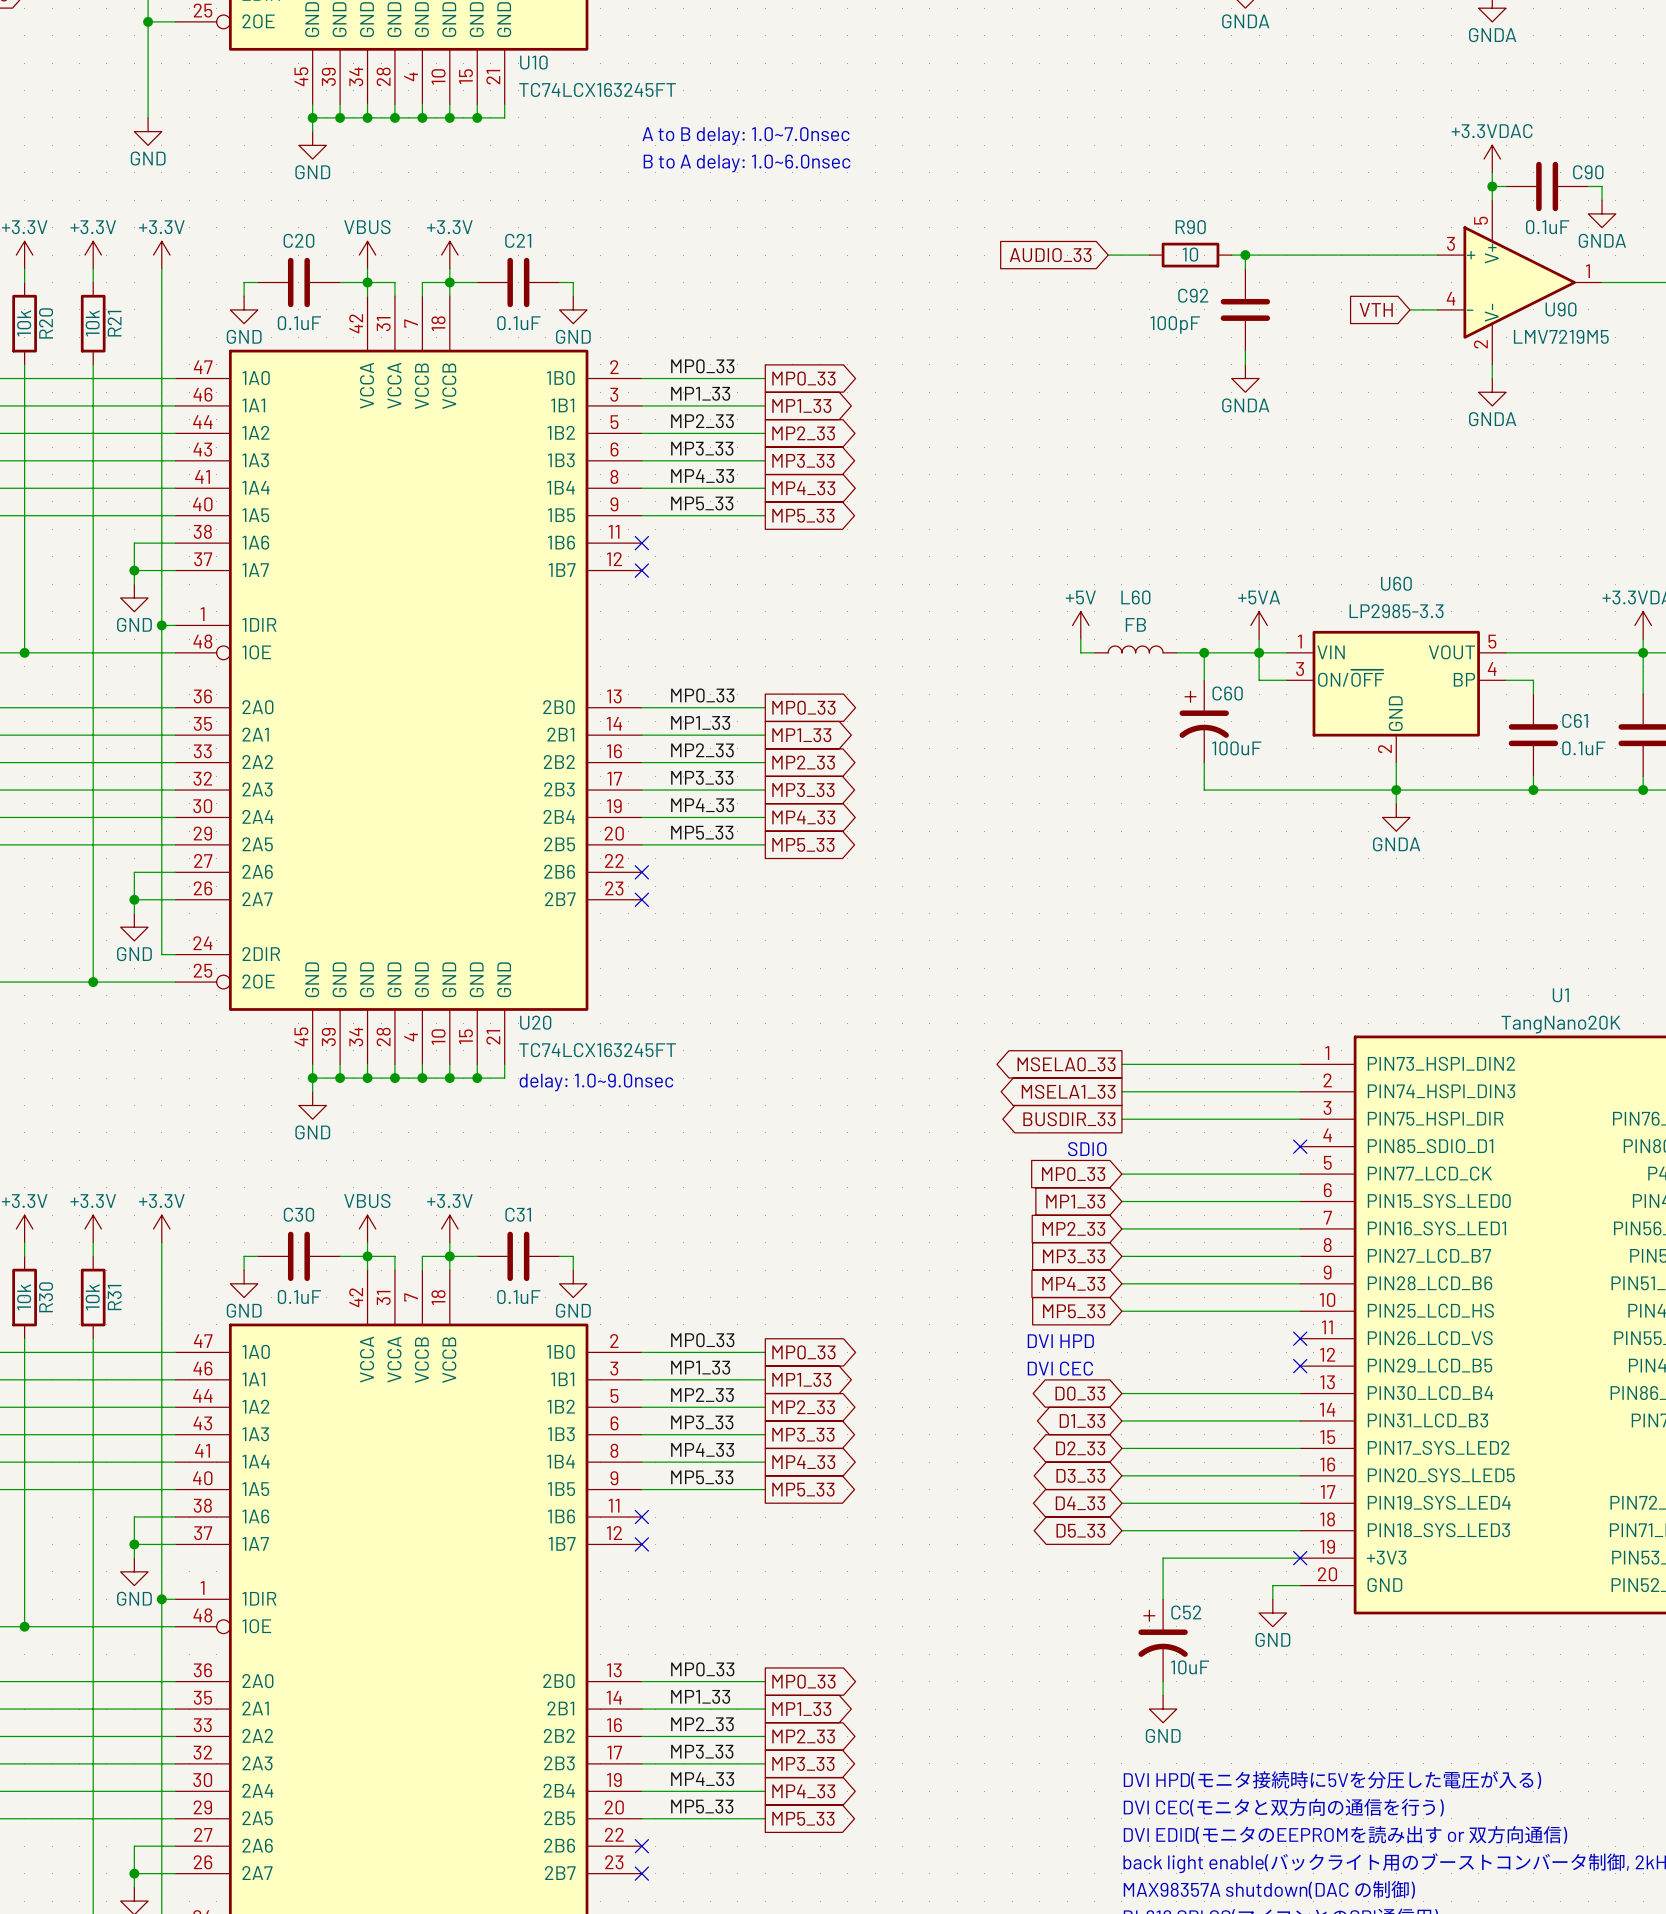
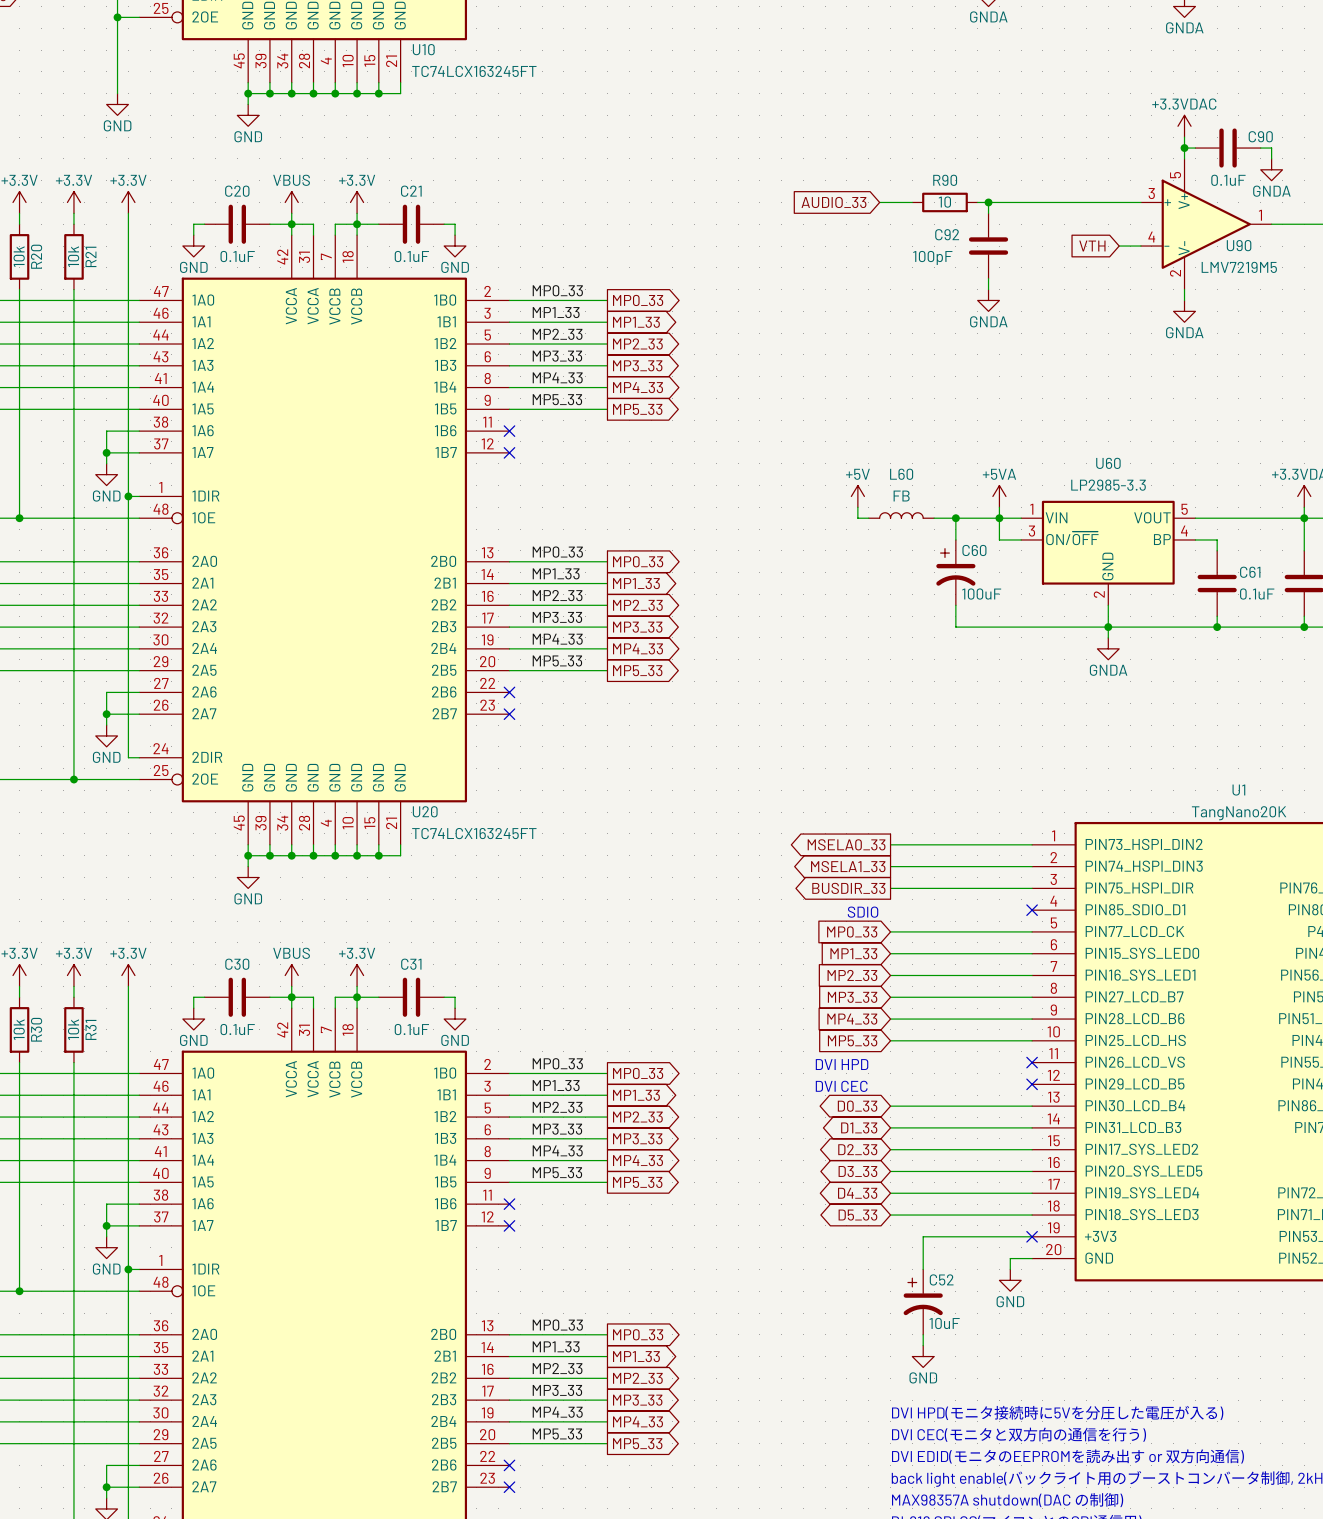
text: A to B delay: 1.0~7.0nsec (746, 135) -> none
text: B to A delay: 1.0~6.0nsec (747, 163) -> none
text: delay: 1.0~9.0nsec (596, 1082) -> none

